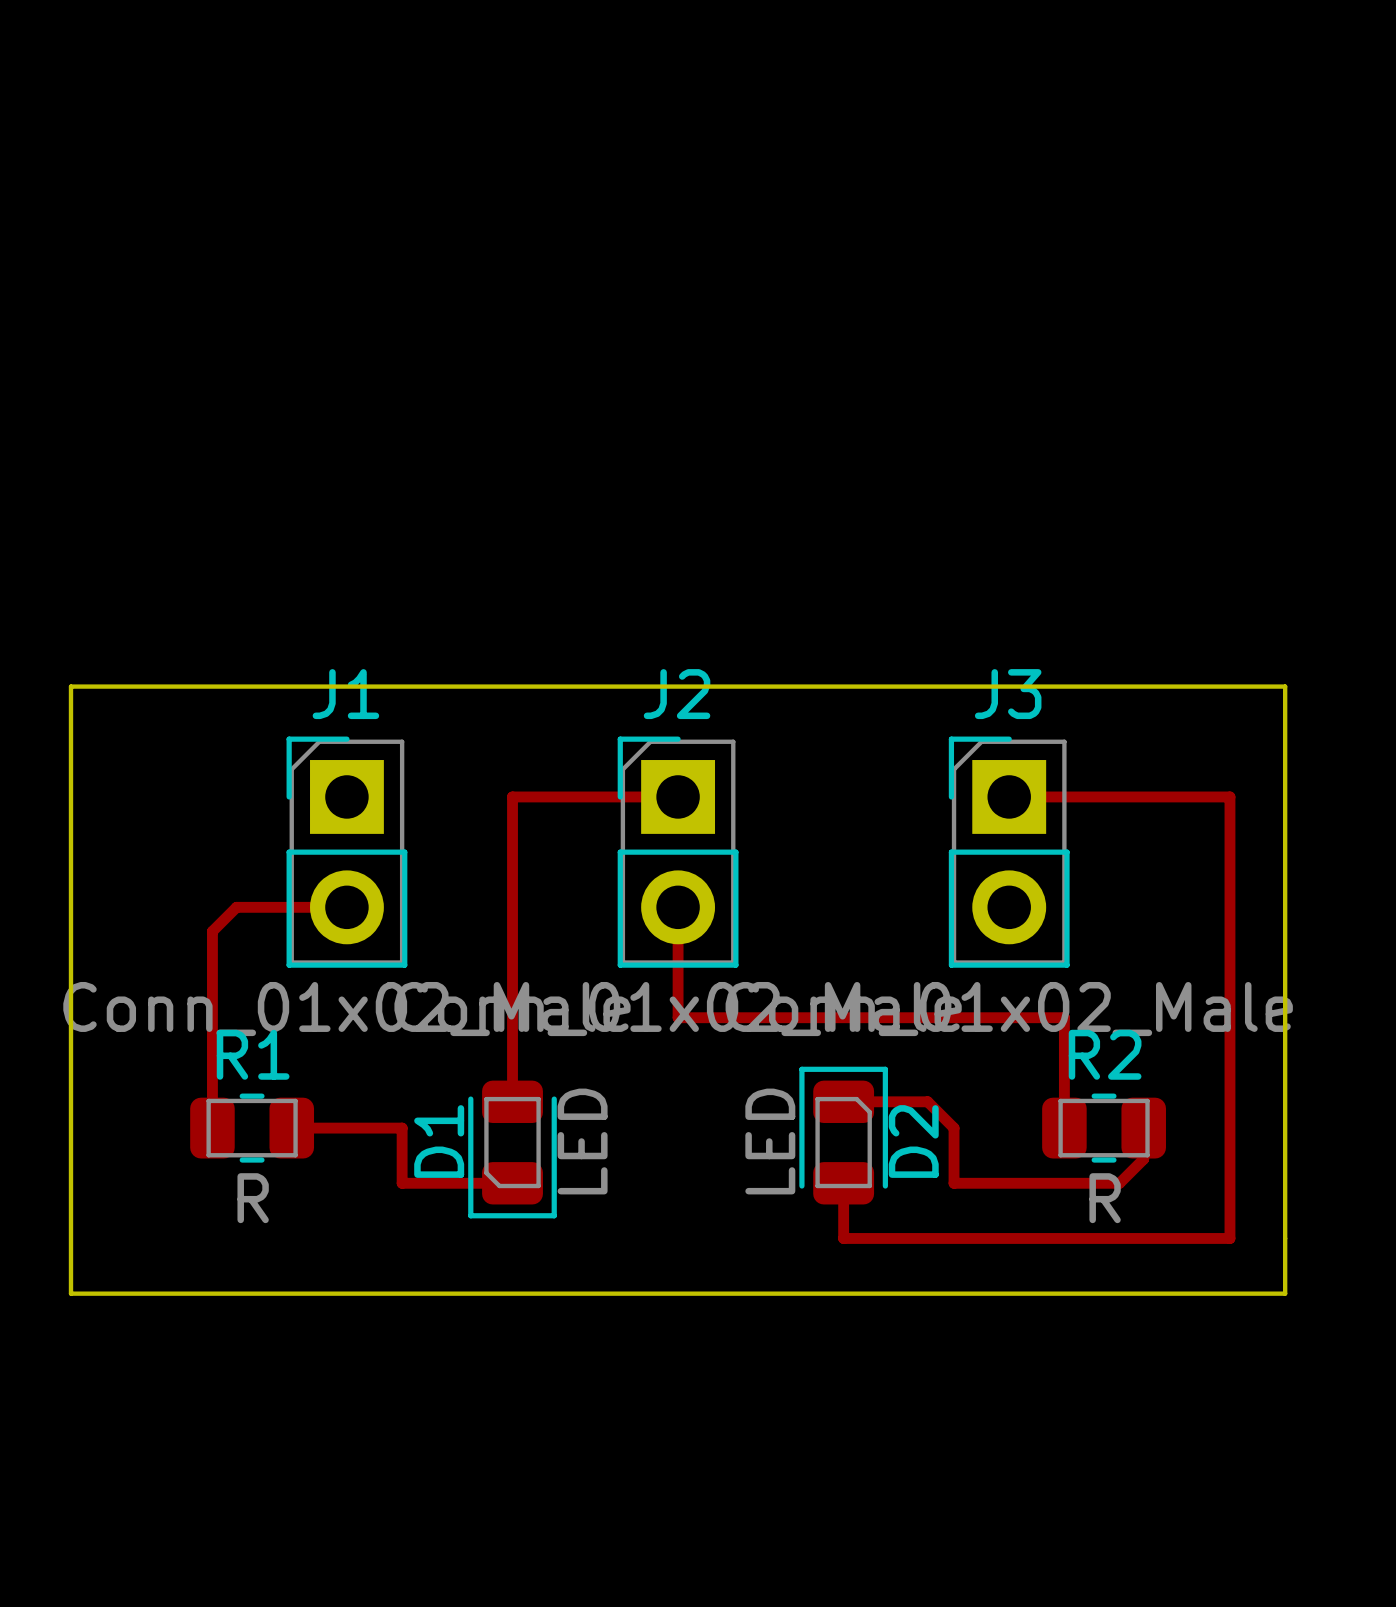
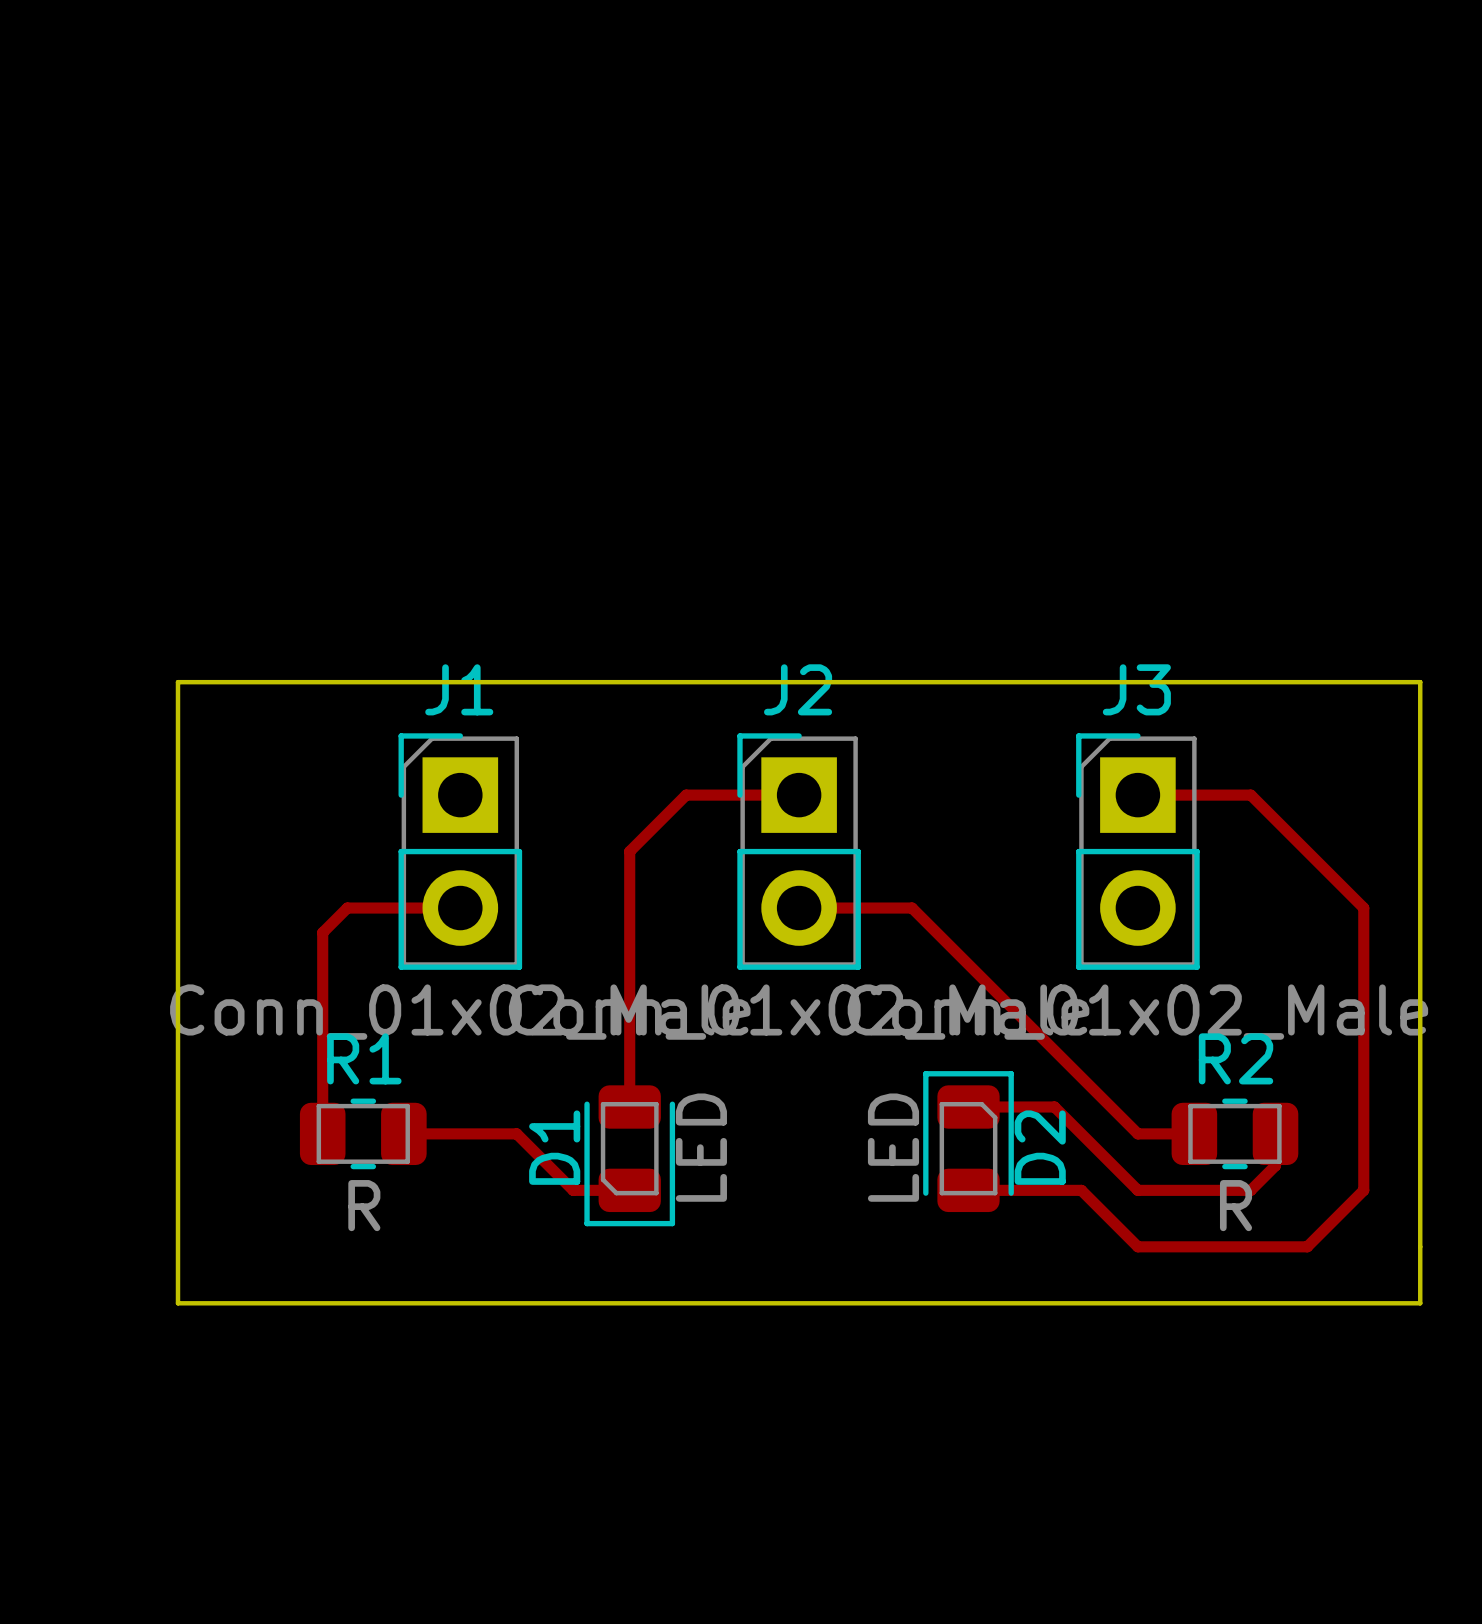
track: (567, 796) (512, 796) (512, 852) -> (686, 795) (629, 851)
track: (1119, 796) (1229, 796) (1229, 907) -> (1250, 795) (1363, 908)
track: (678, 907) (678, 1017) (1064, 1017) (1064, 1128) -> (799, 908) (912, 908) (1137, 1133) (1194, 1133)
track: (402, 1128) (402, 1183) (457, 1183) -> (516, 1133) (573, 1190)
track: (954, 1128) (954, 1183) (1009, 1183) -> (1081, 1133) (1137, 1190)
track: (843, 1183) (843, 1238) (1009, 1238) -> (968, 1190) (1081, 1190) (1137, 1246)
track: (1229, 1183) (1229, 1238) (1174, 1238) -> (1363, 1190) (1307, 1246)

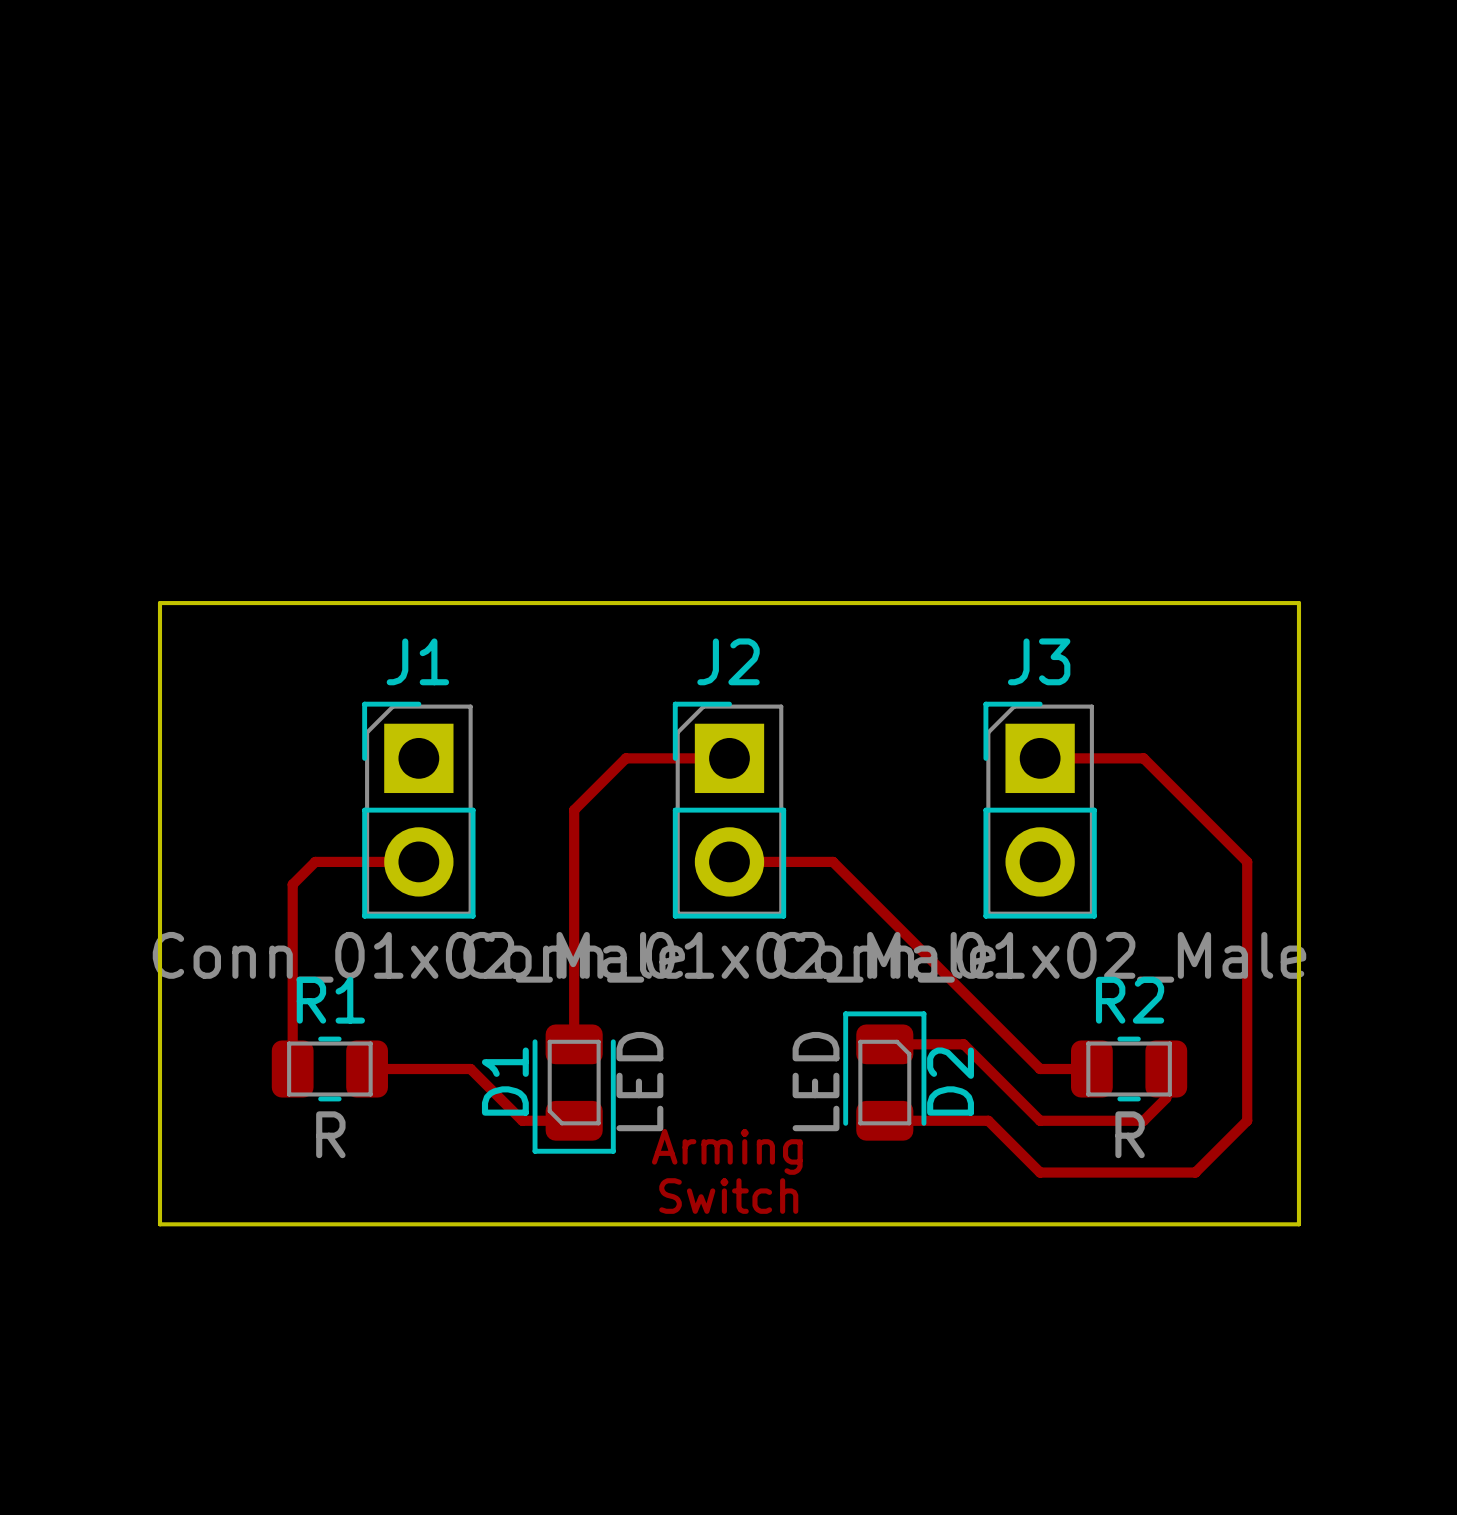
board edge: (177, 682) (1420, 682) -> (159, 654) (159, 603) (1298, 603) (1298, 654)
text: none -> Arming (727, 1151)
text: none -> Switch (728, 1196)

